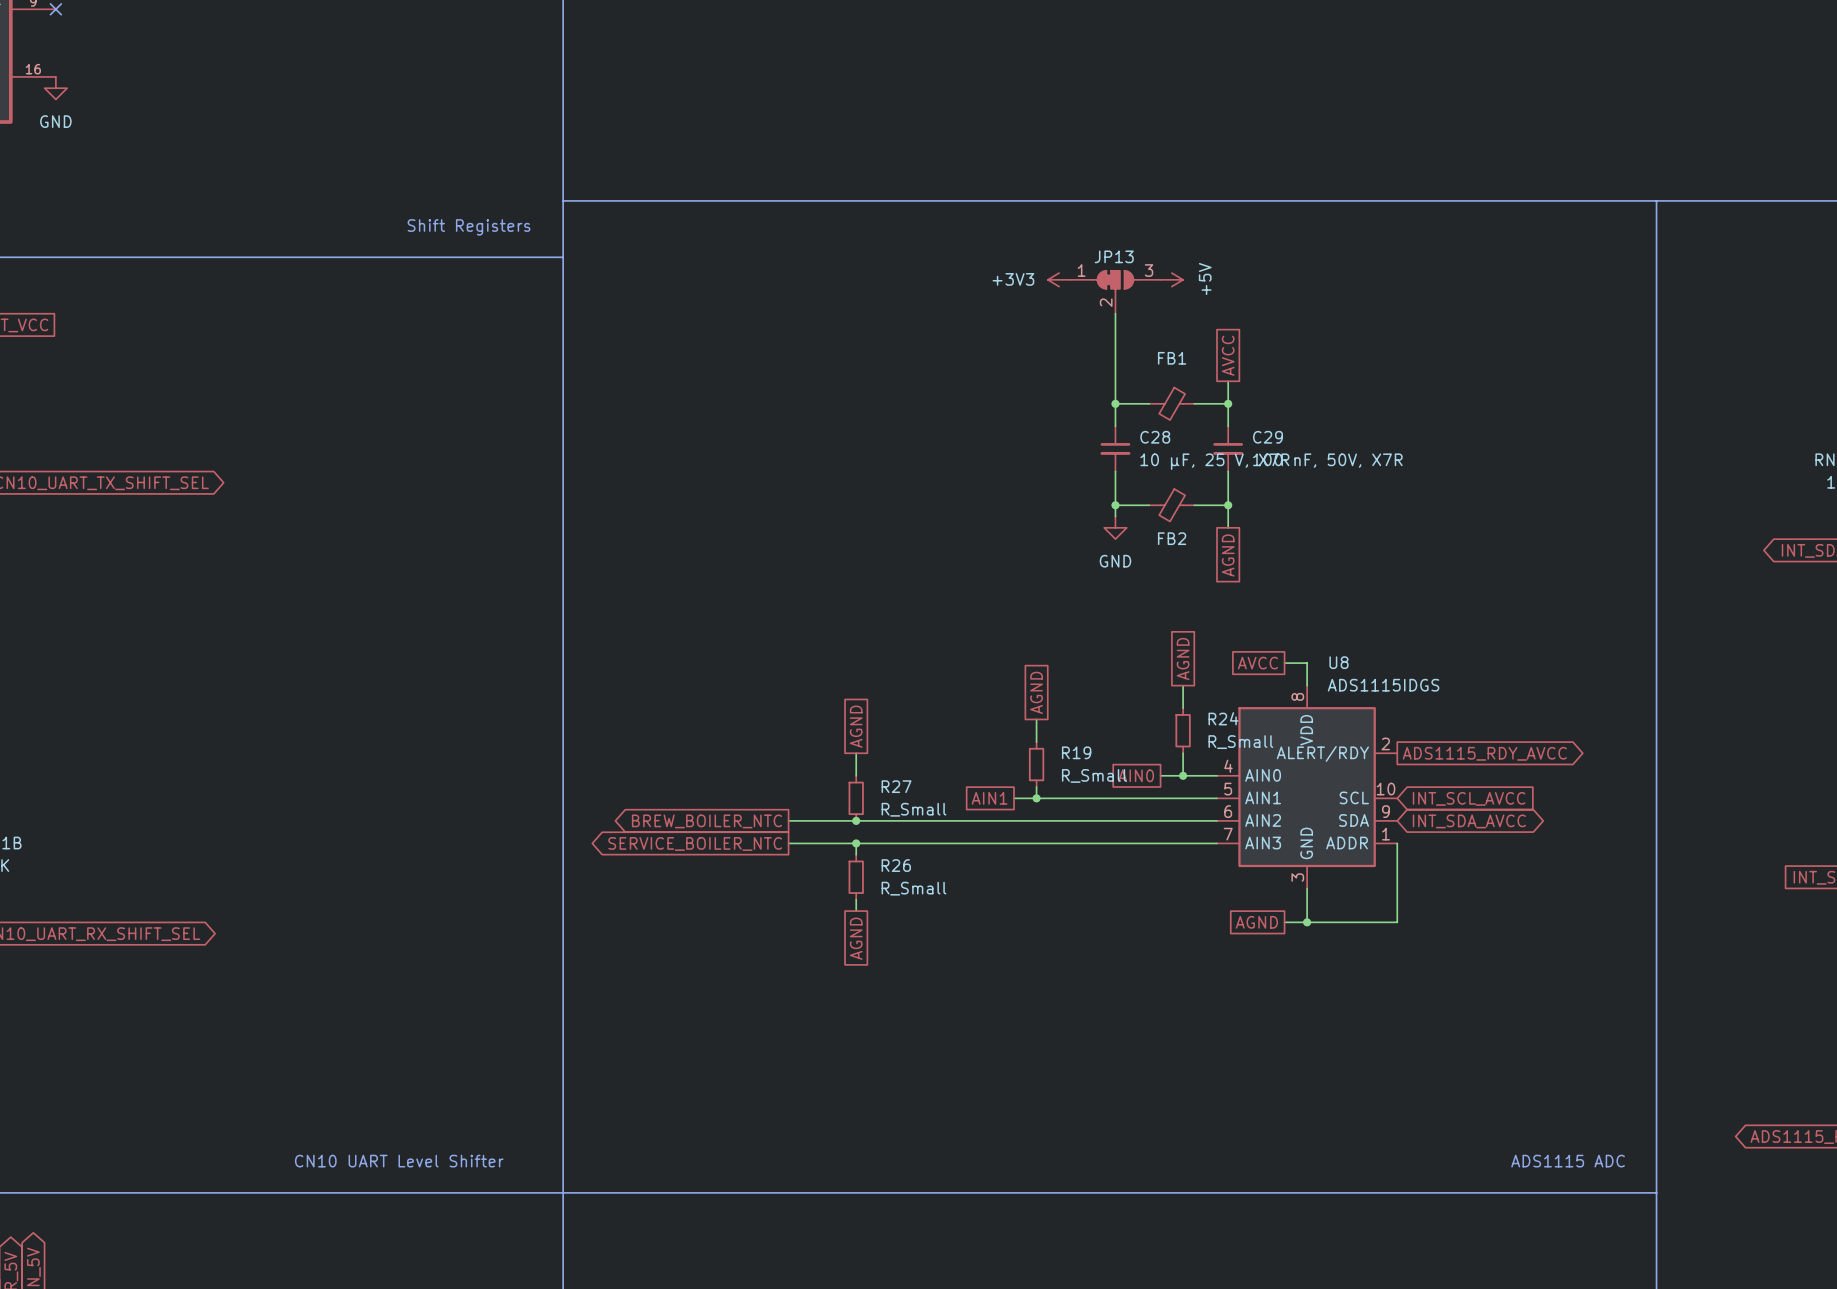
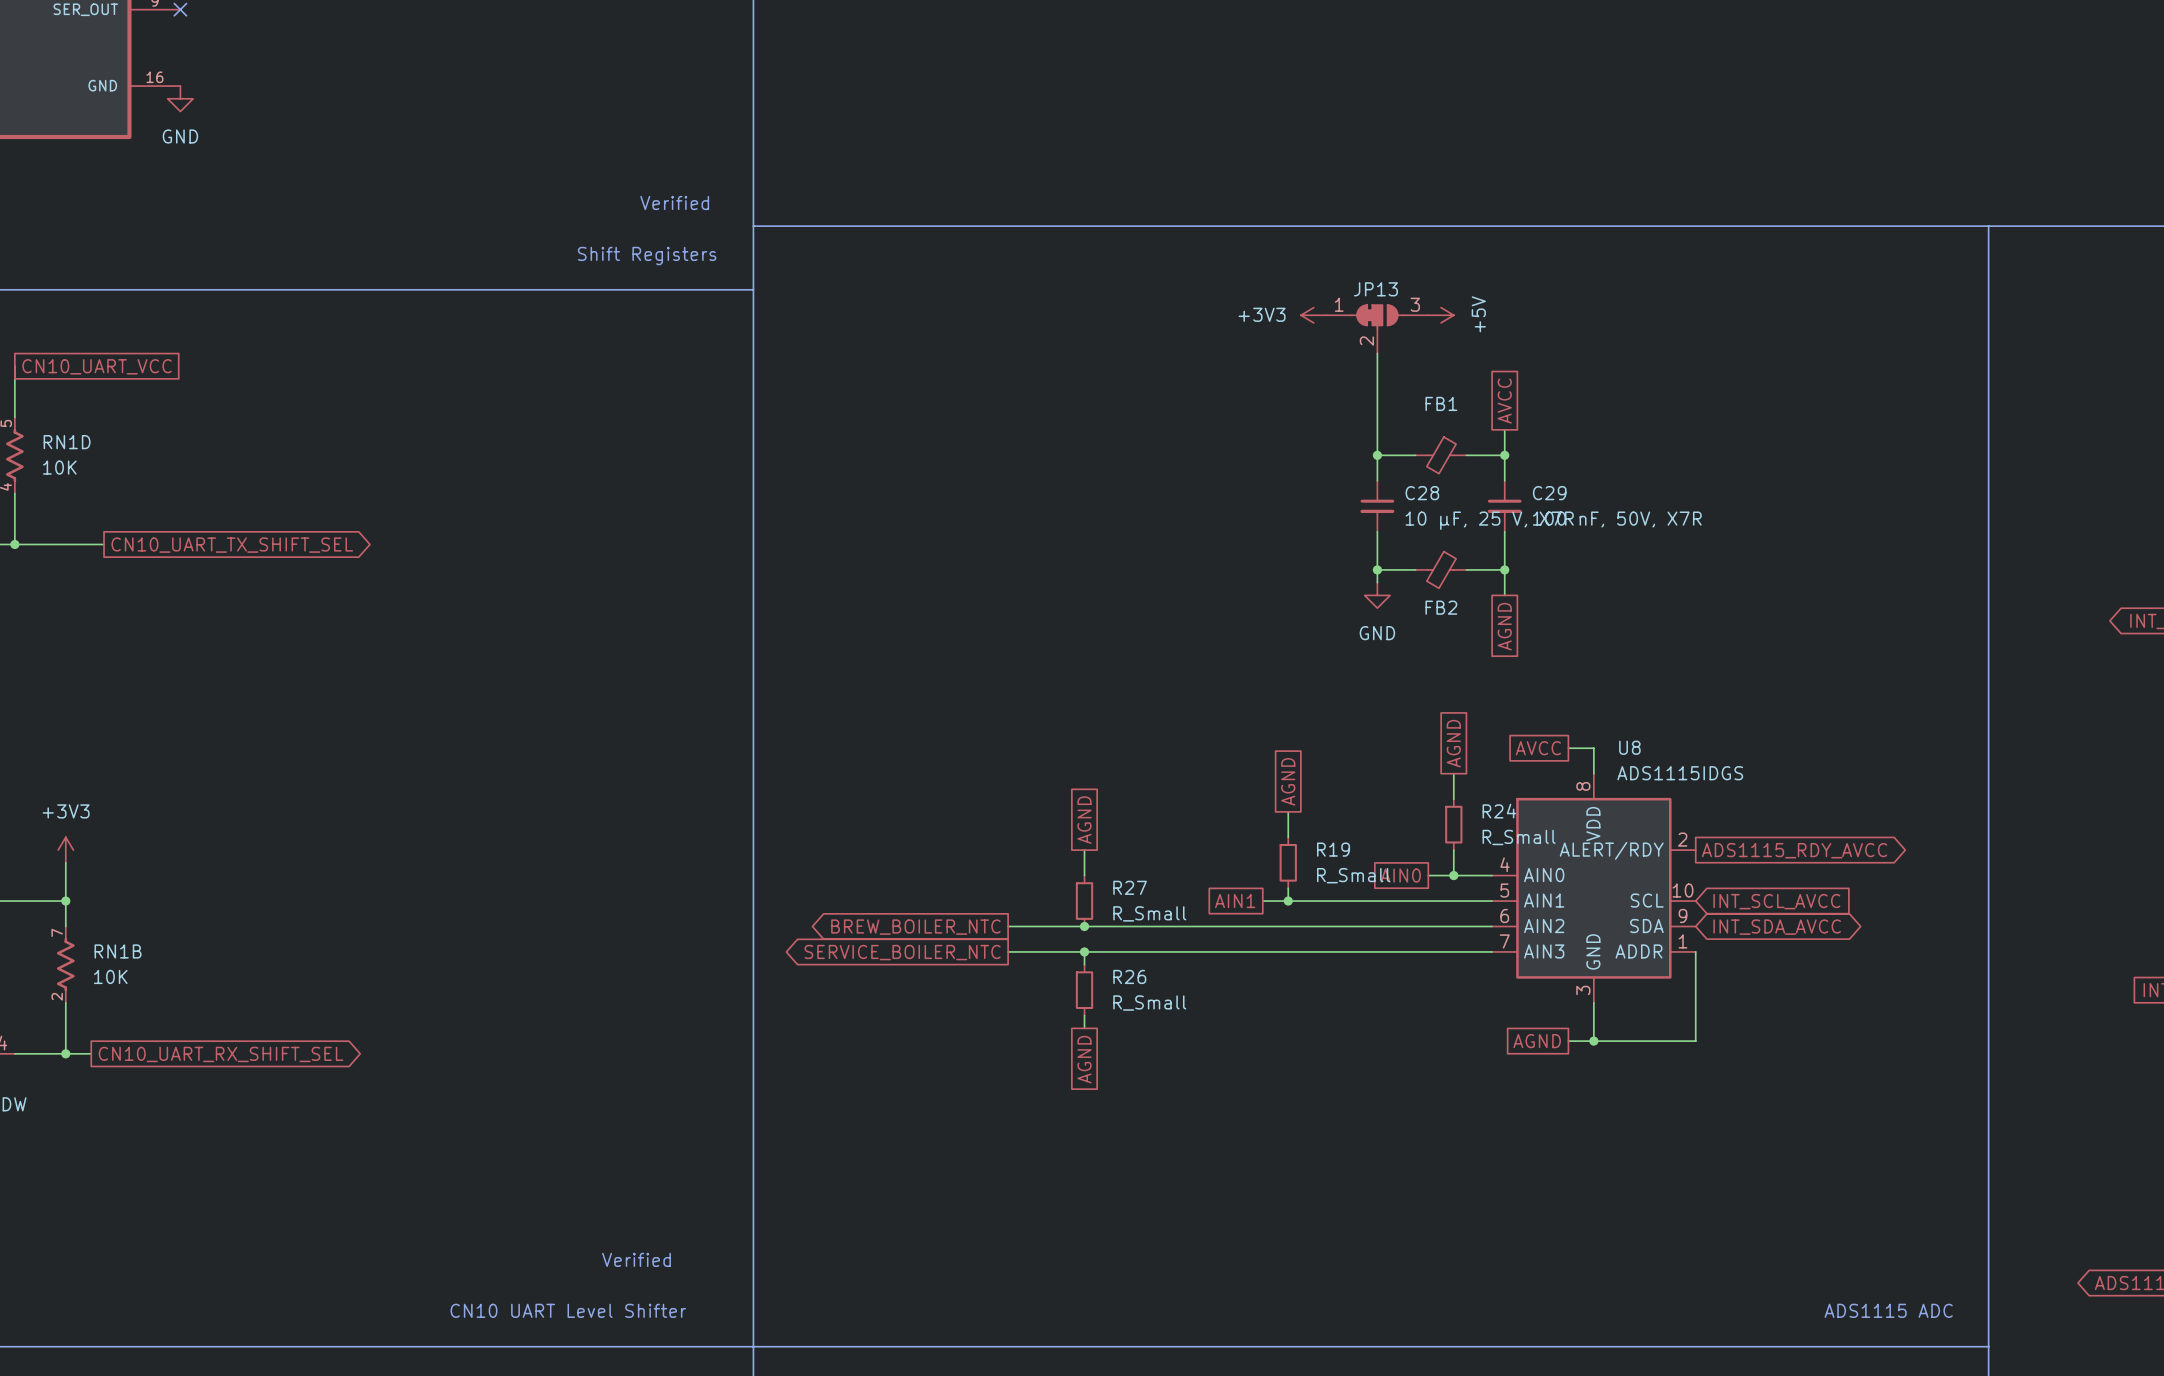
text: none -> Verified (674, 202)
text: none -> Verified (636, 1259)

